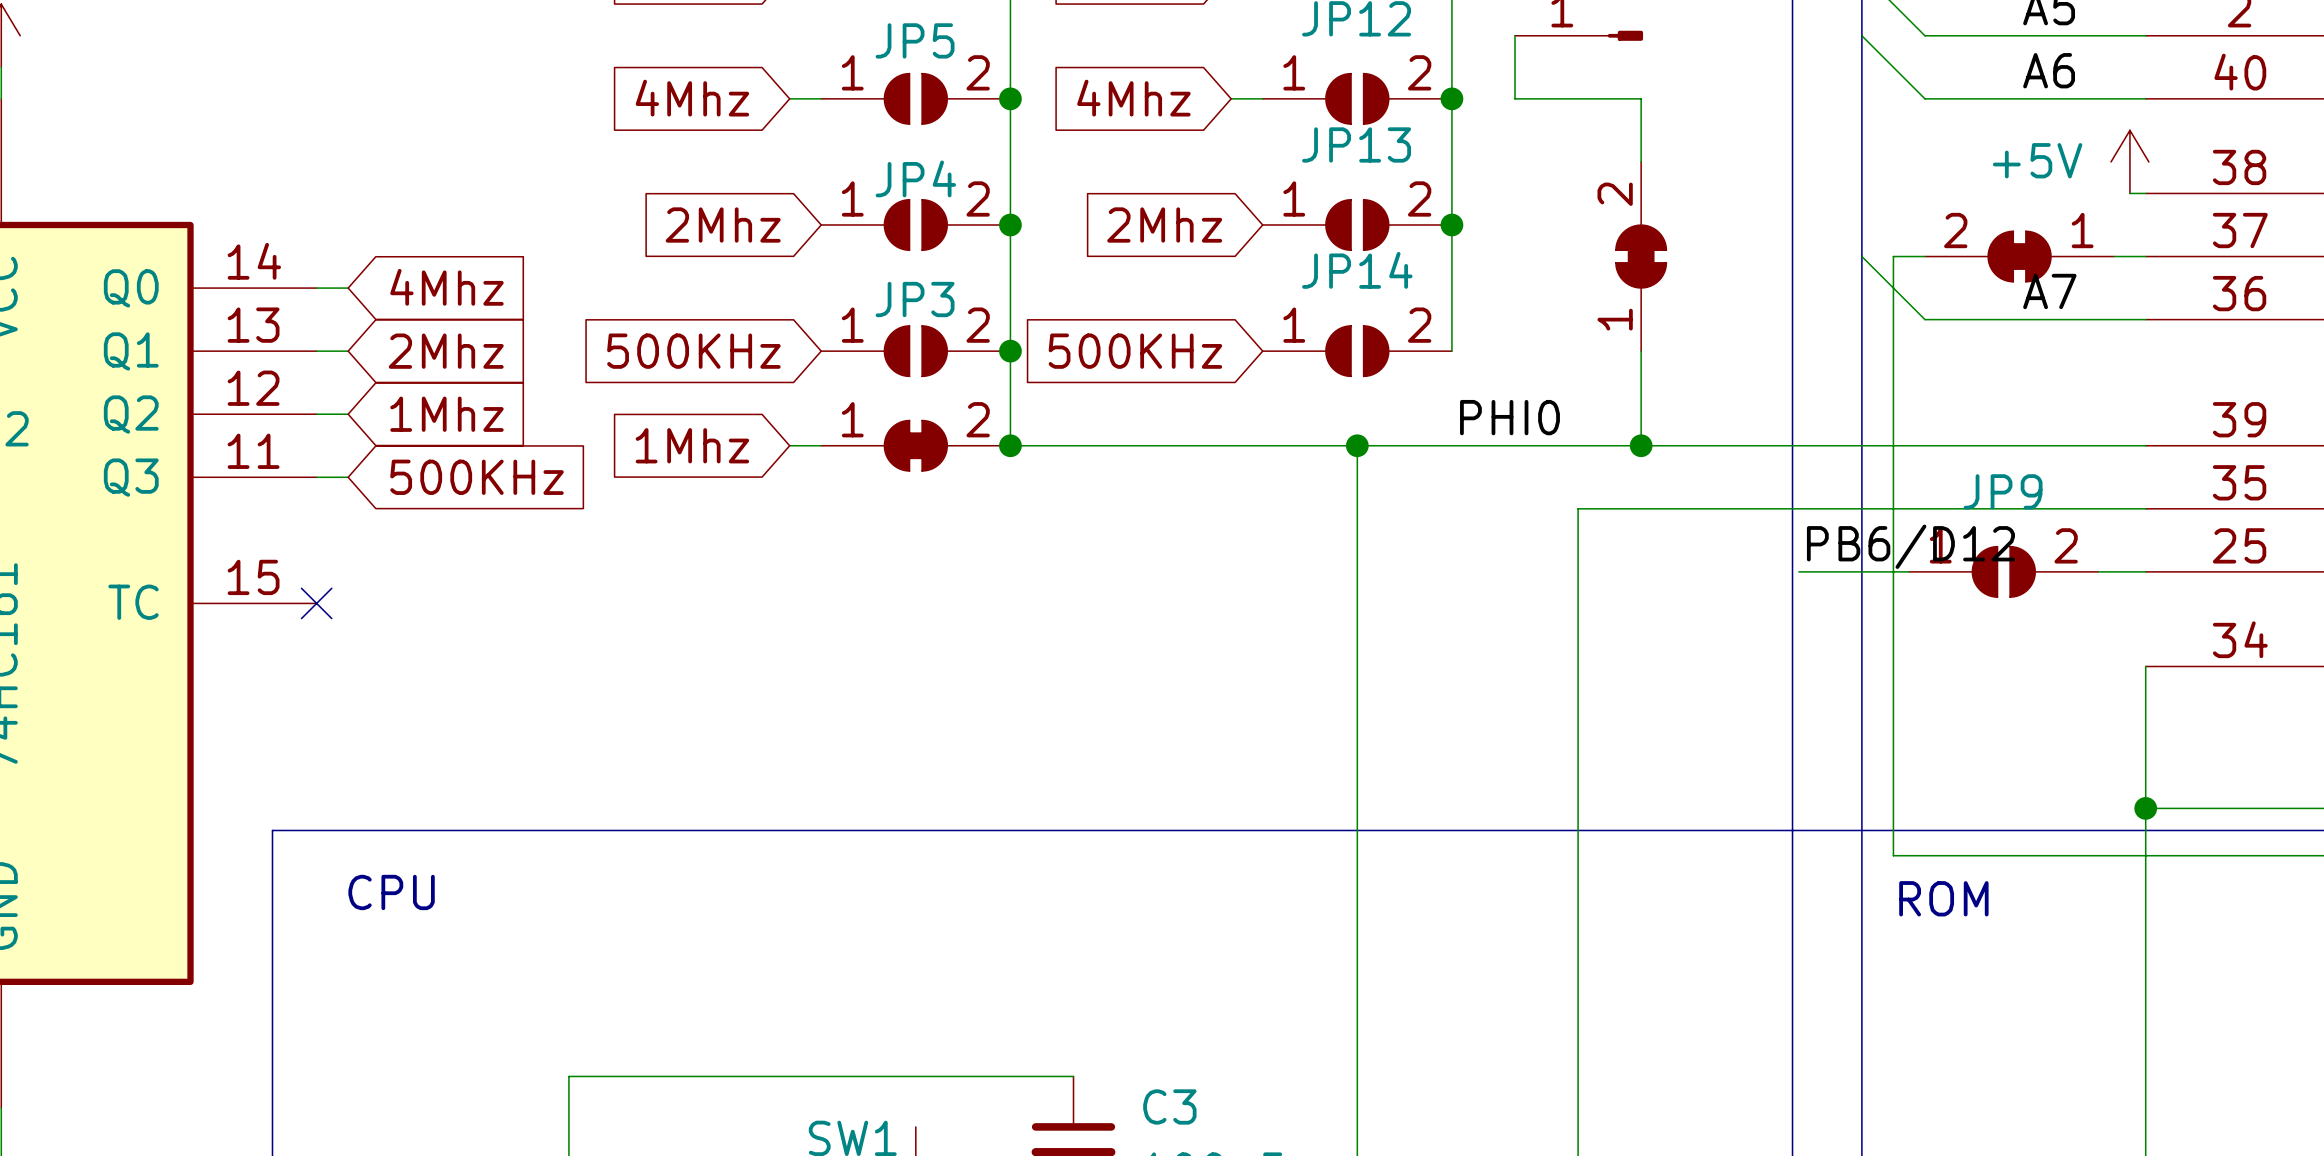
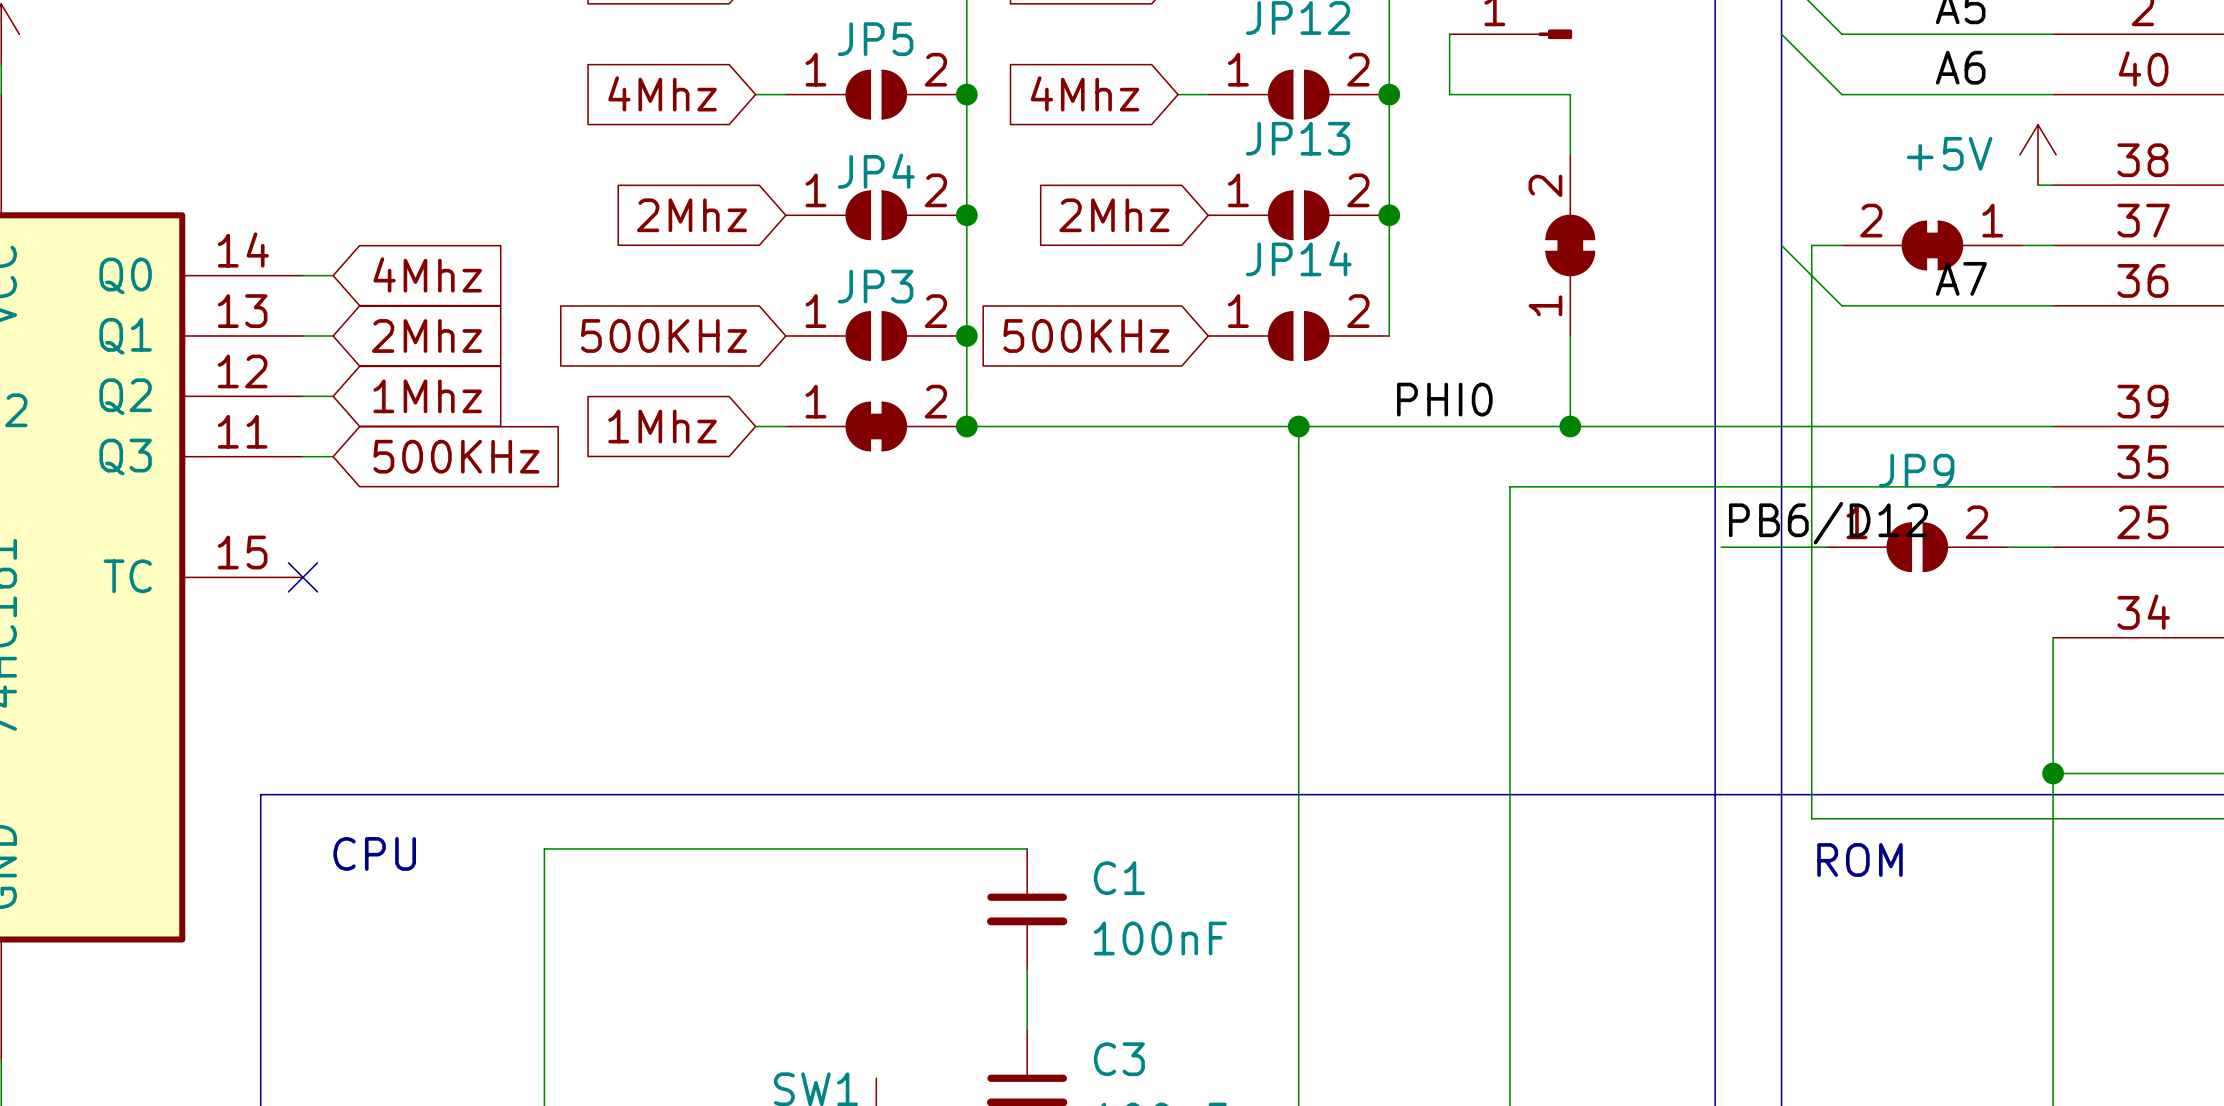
C1: none -> 100nF (1027, 909)
wire: none -> (1027, 969) (1027, 1030)
wire: (568, 1076) (1073, 1076) -> (544, 1030) (544, 848) (1027, 848)

